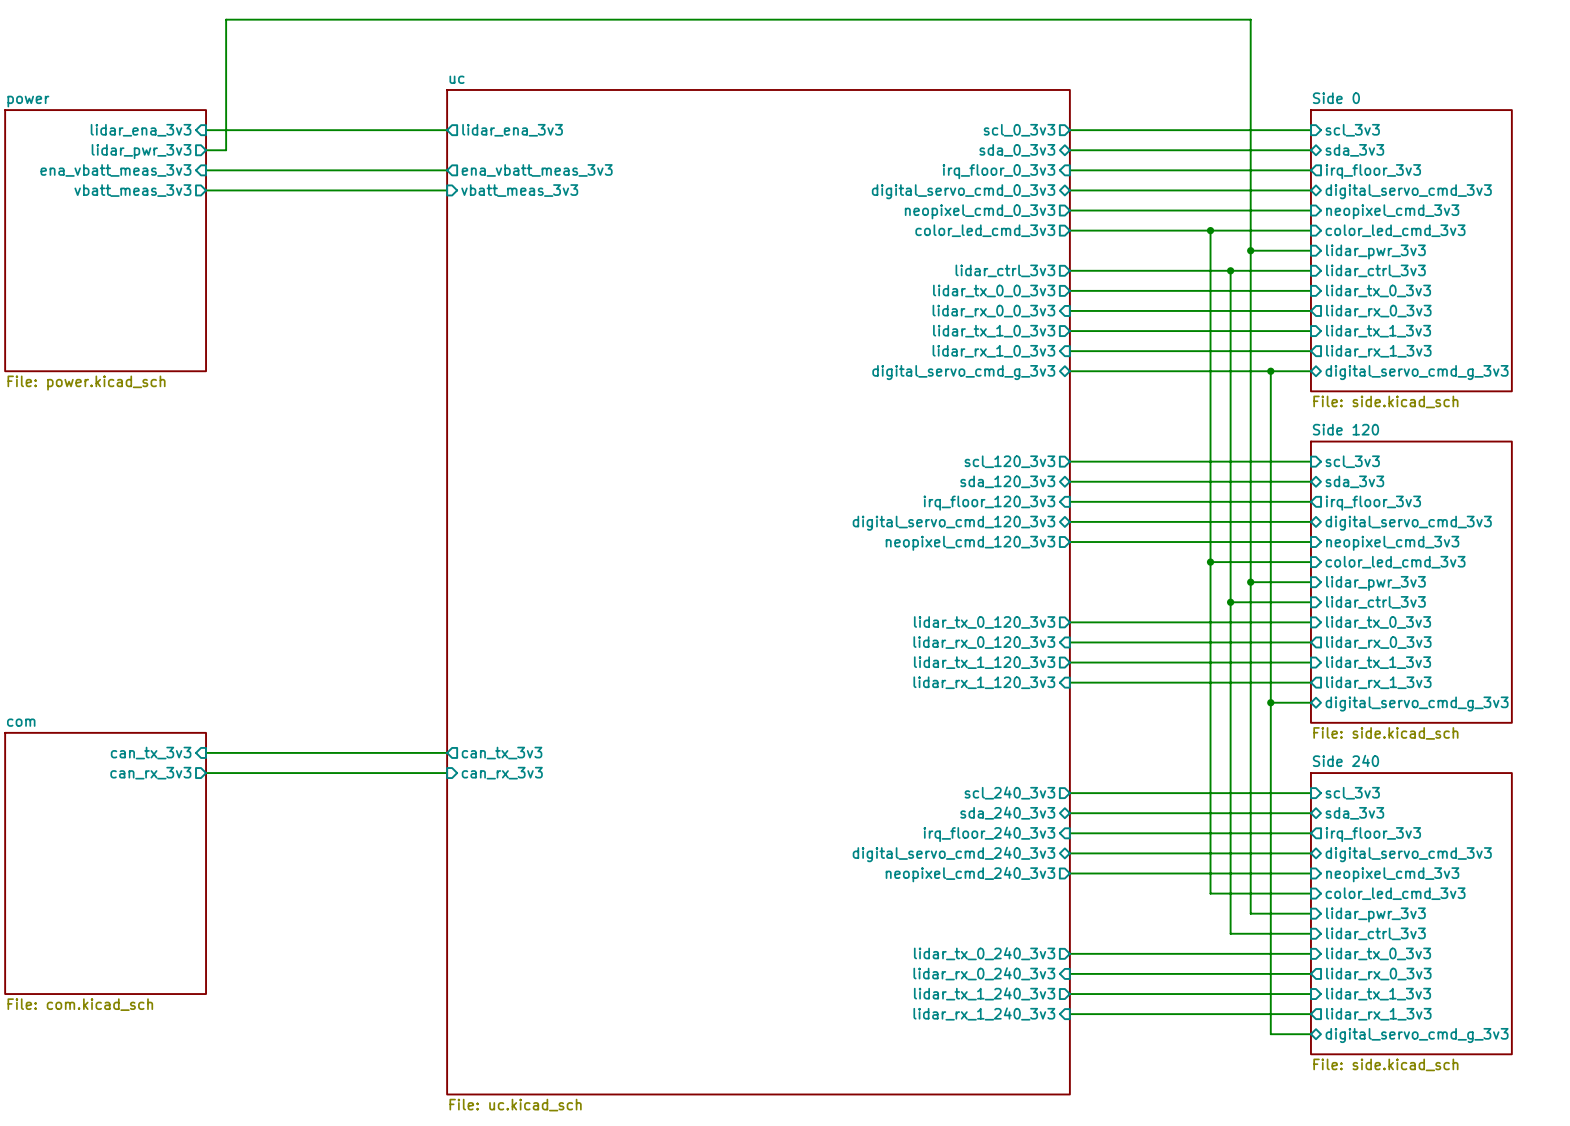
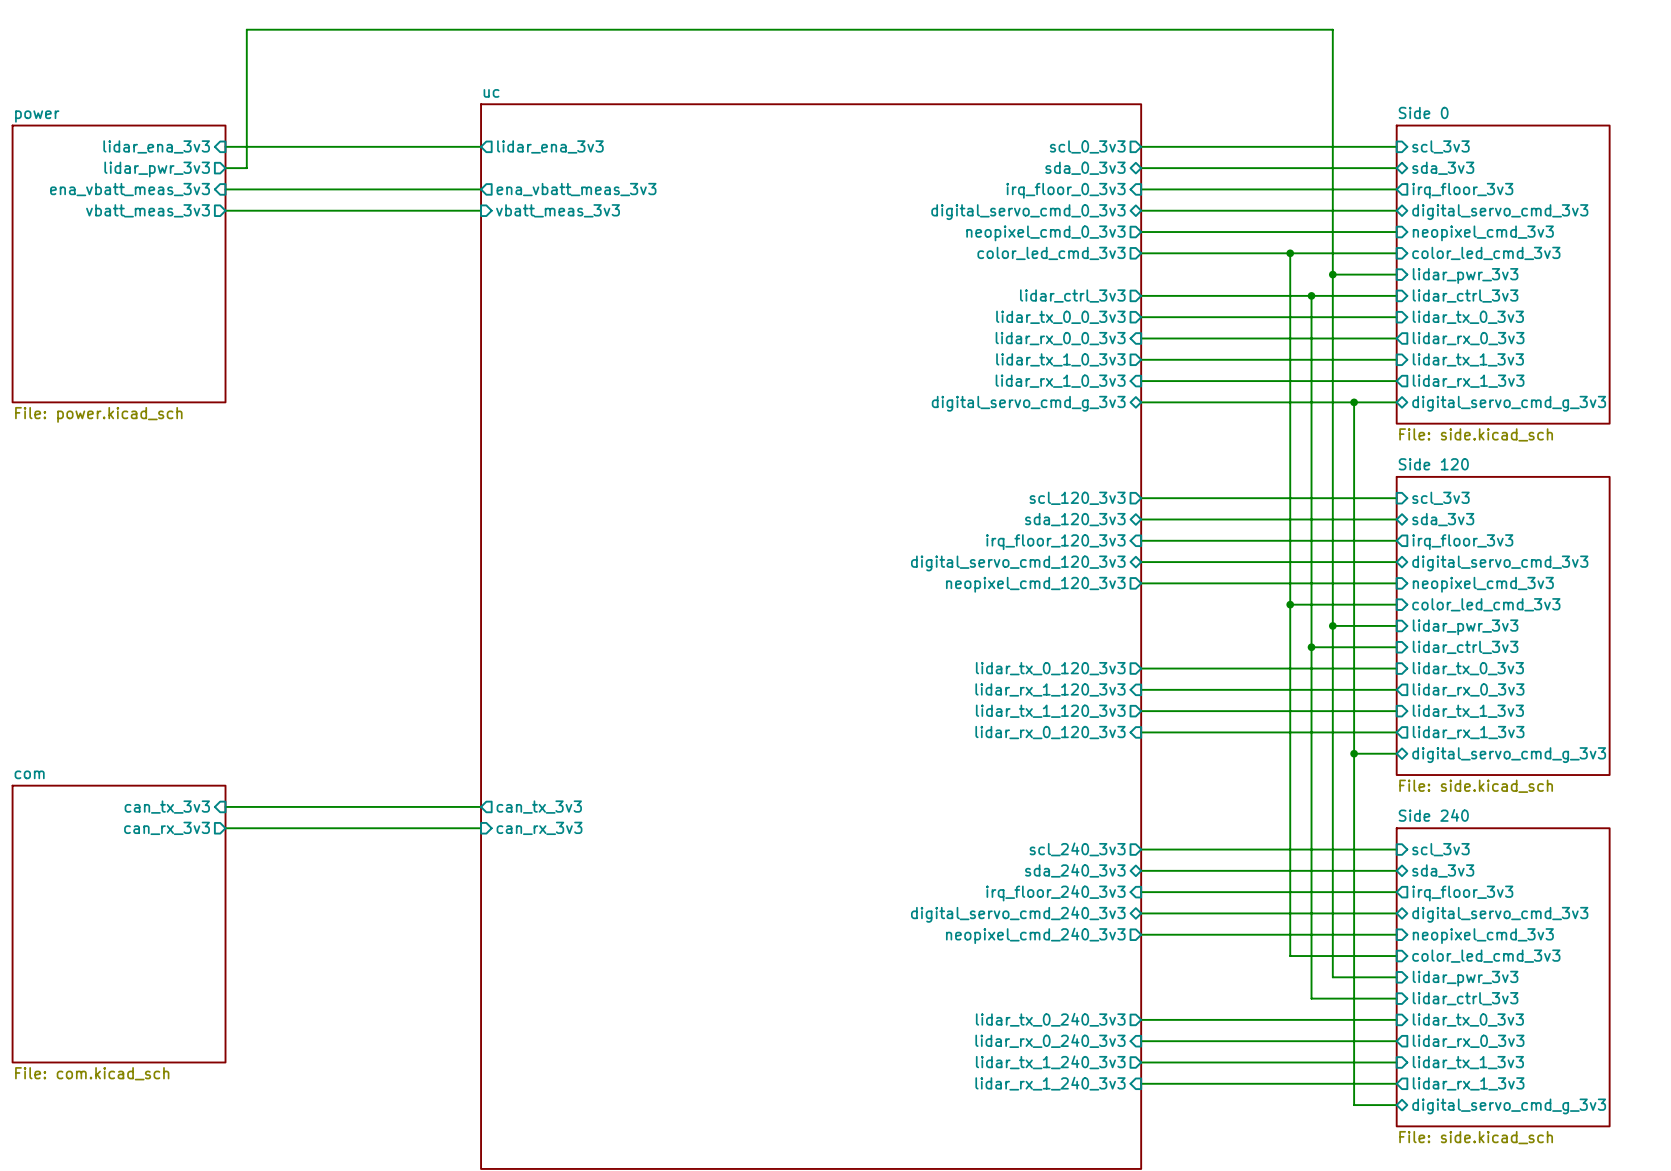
sheet pin: lidar_rx_0_120_3v3 (984, 642) -> lidar_rx_1_120_3v3 (1050, 689)
sheet pin: lidar_rx_1_120_3v3 (984, 682) -> lidar_rx_0_120_3v3 (1050, 732)

